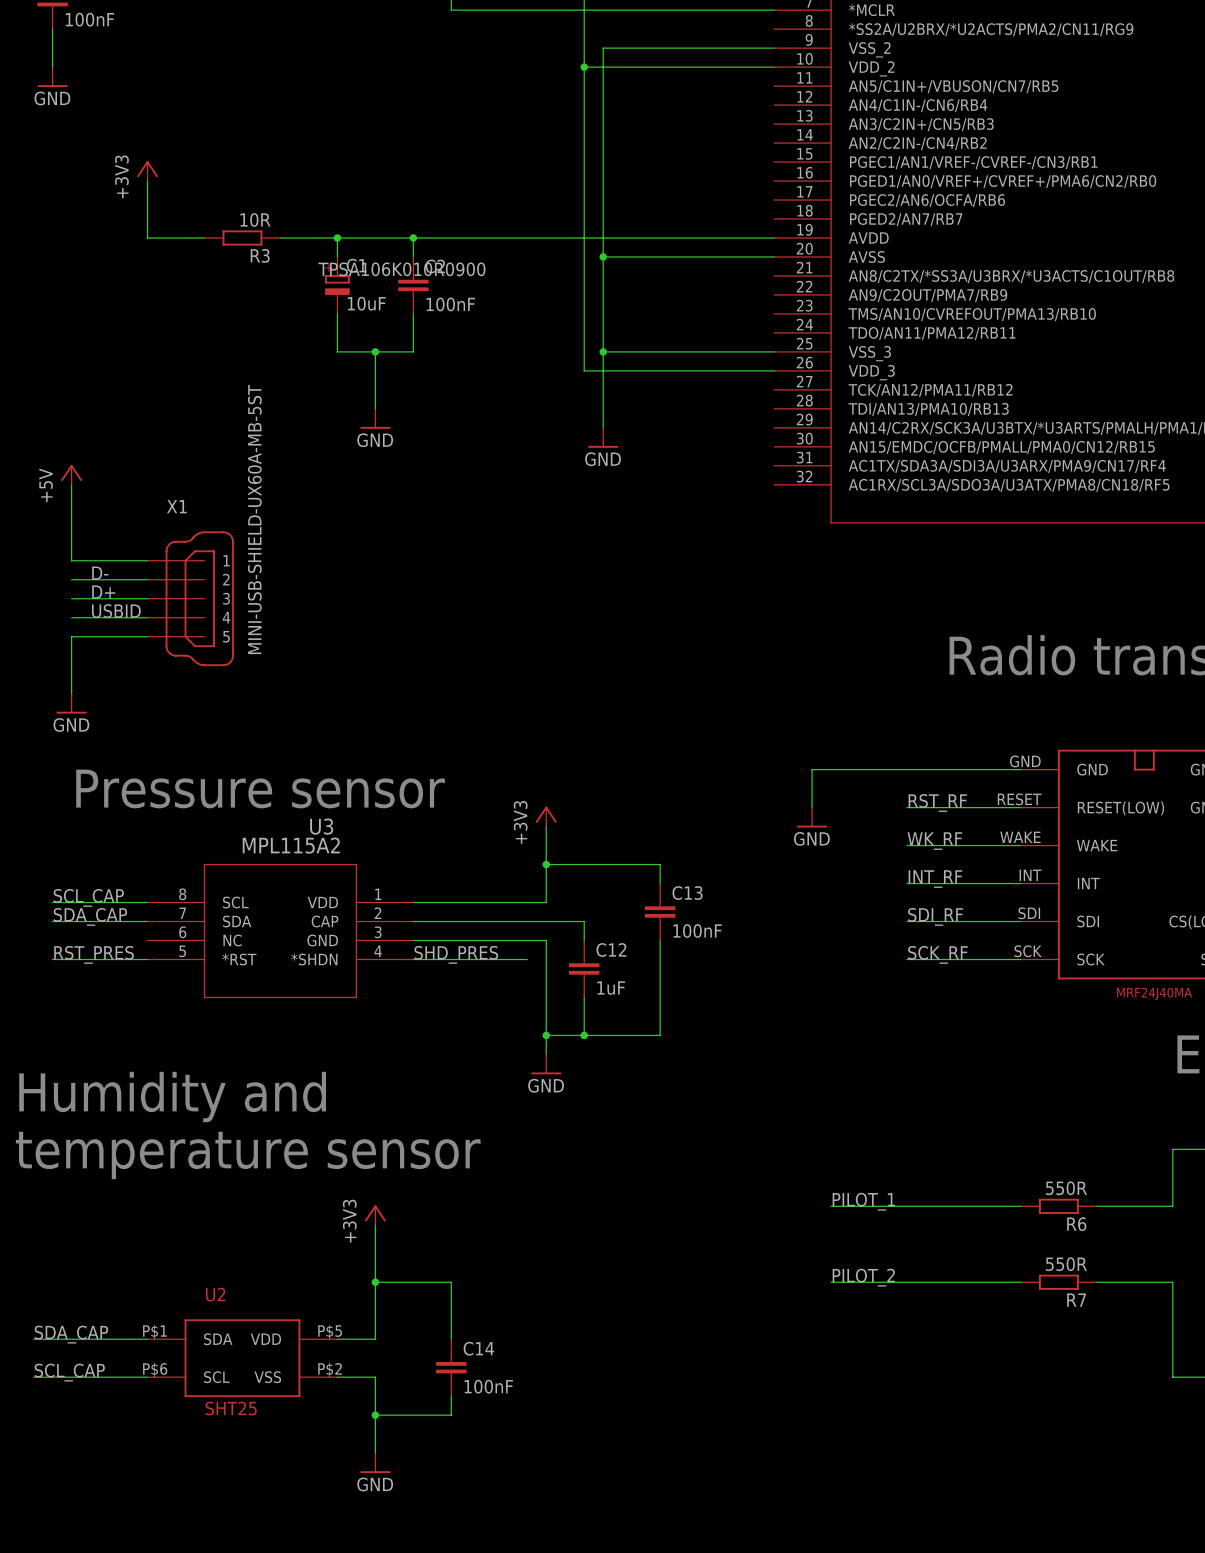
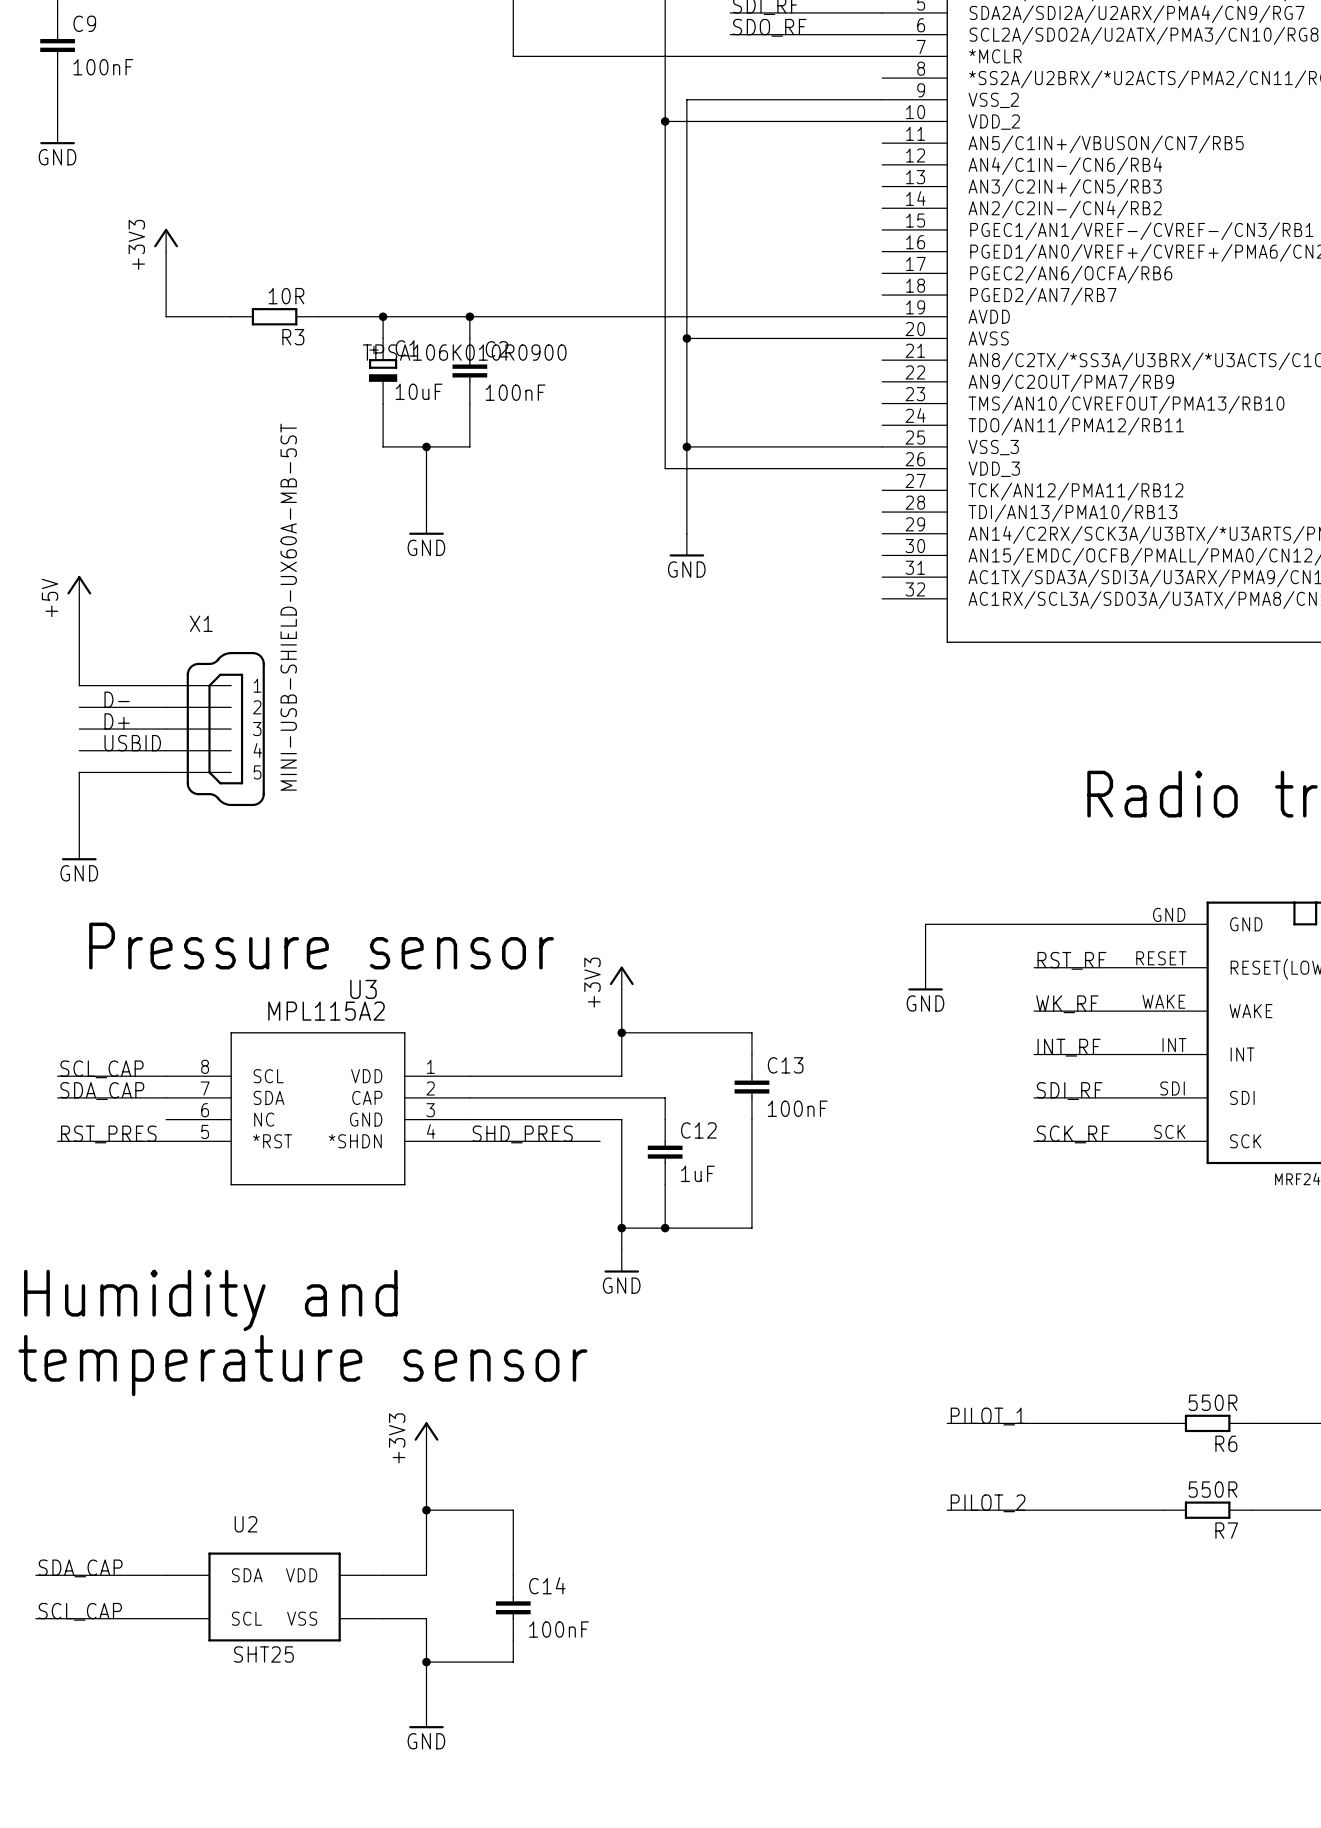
U2 pin number: P$1 (154, 1331) -> none
U2 pin number: P$5 (330, 1331) -> none
U2 pin number: P$6 (155, 1369) -> none
U2 pin number: P$2 (330, 1369) -> none

